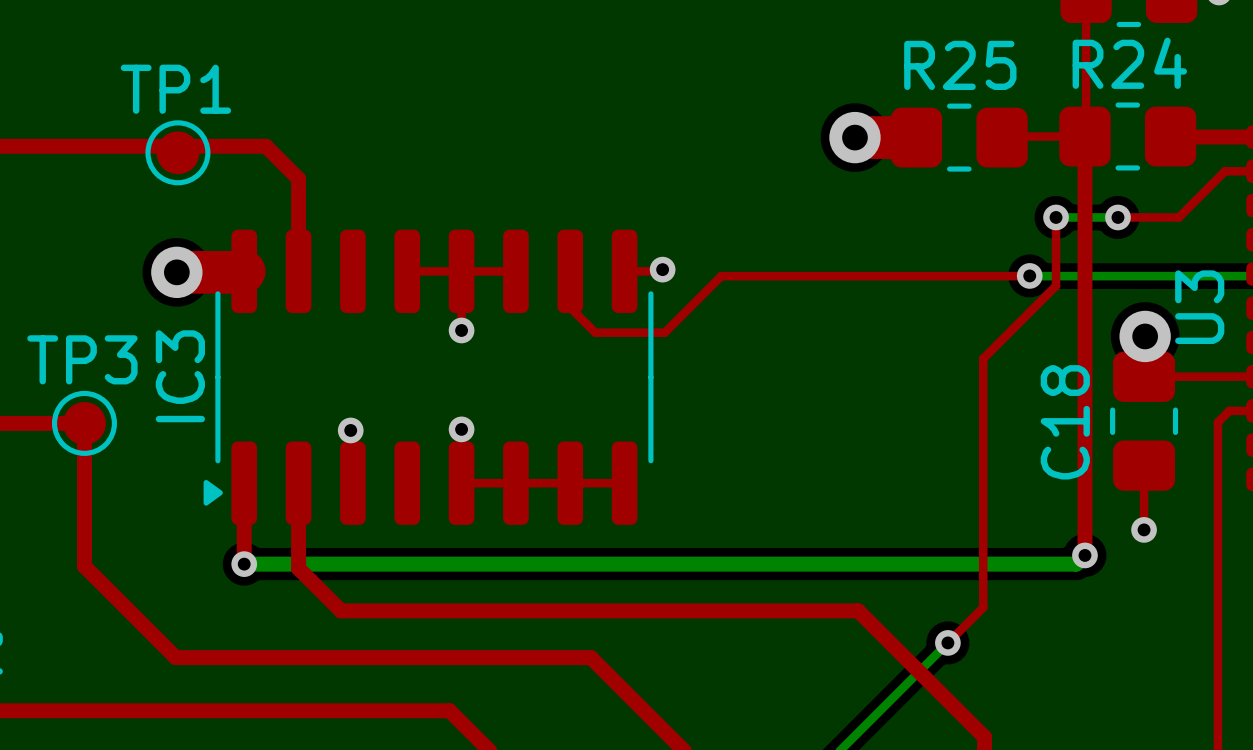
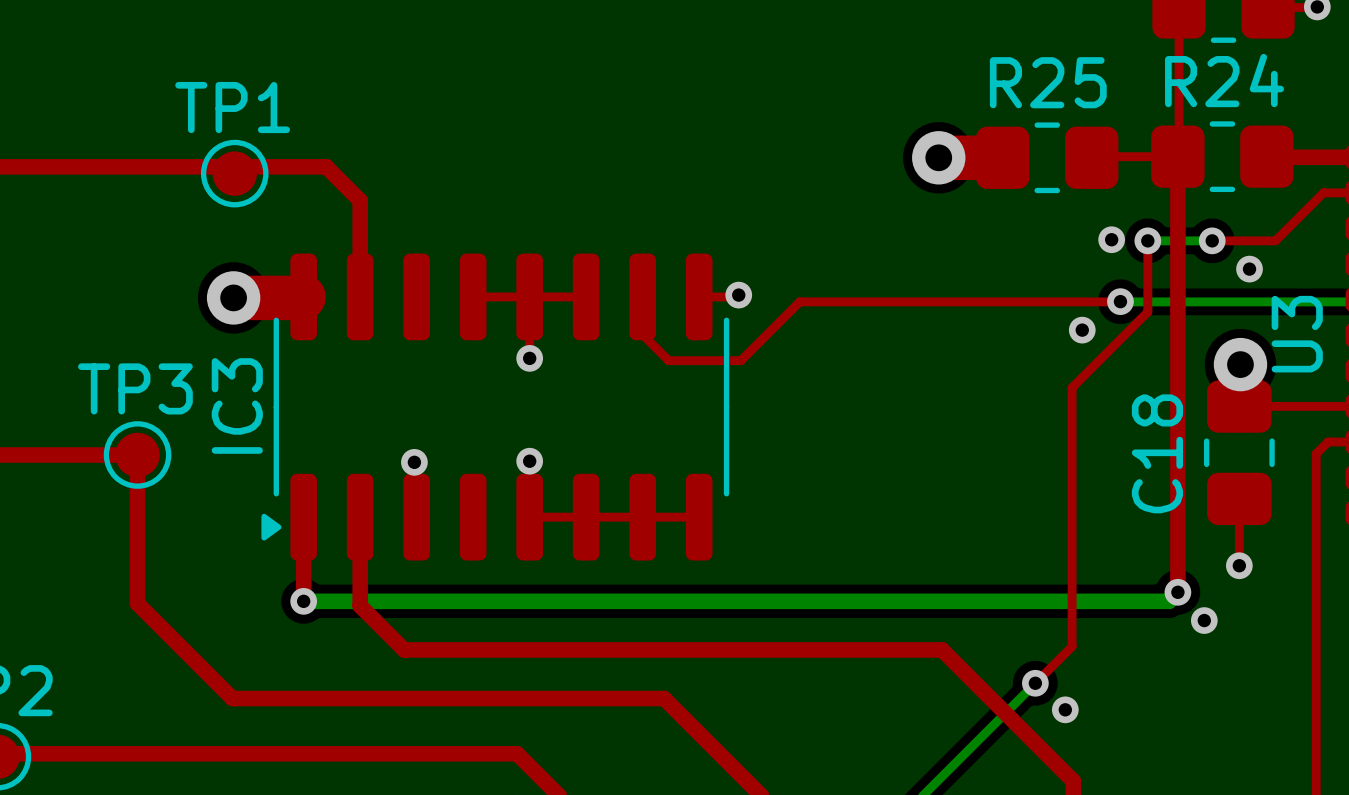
via: none -> (1111, 239)
via: none -> (1249, 269)
via: none -> (1082, 330)
via: none -> (1204, 620)
via: none -> (1065, 709)

